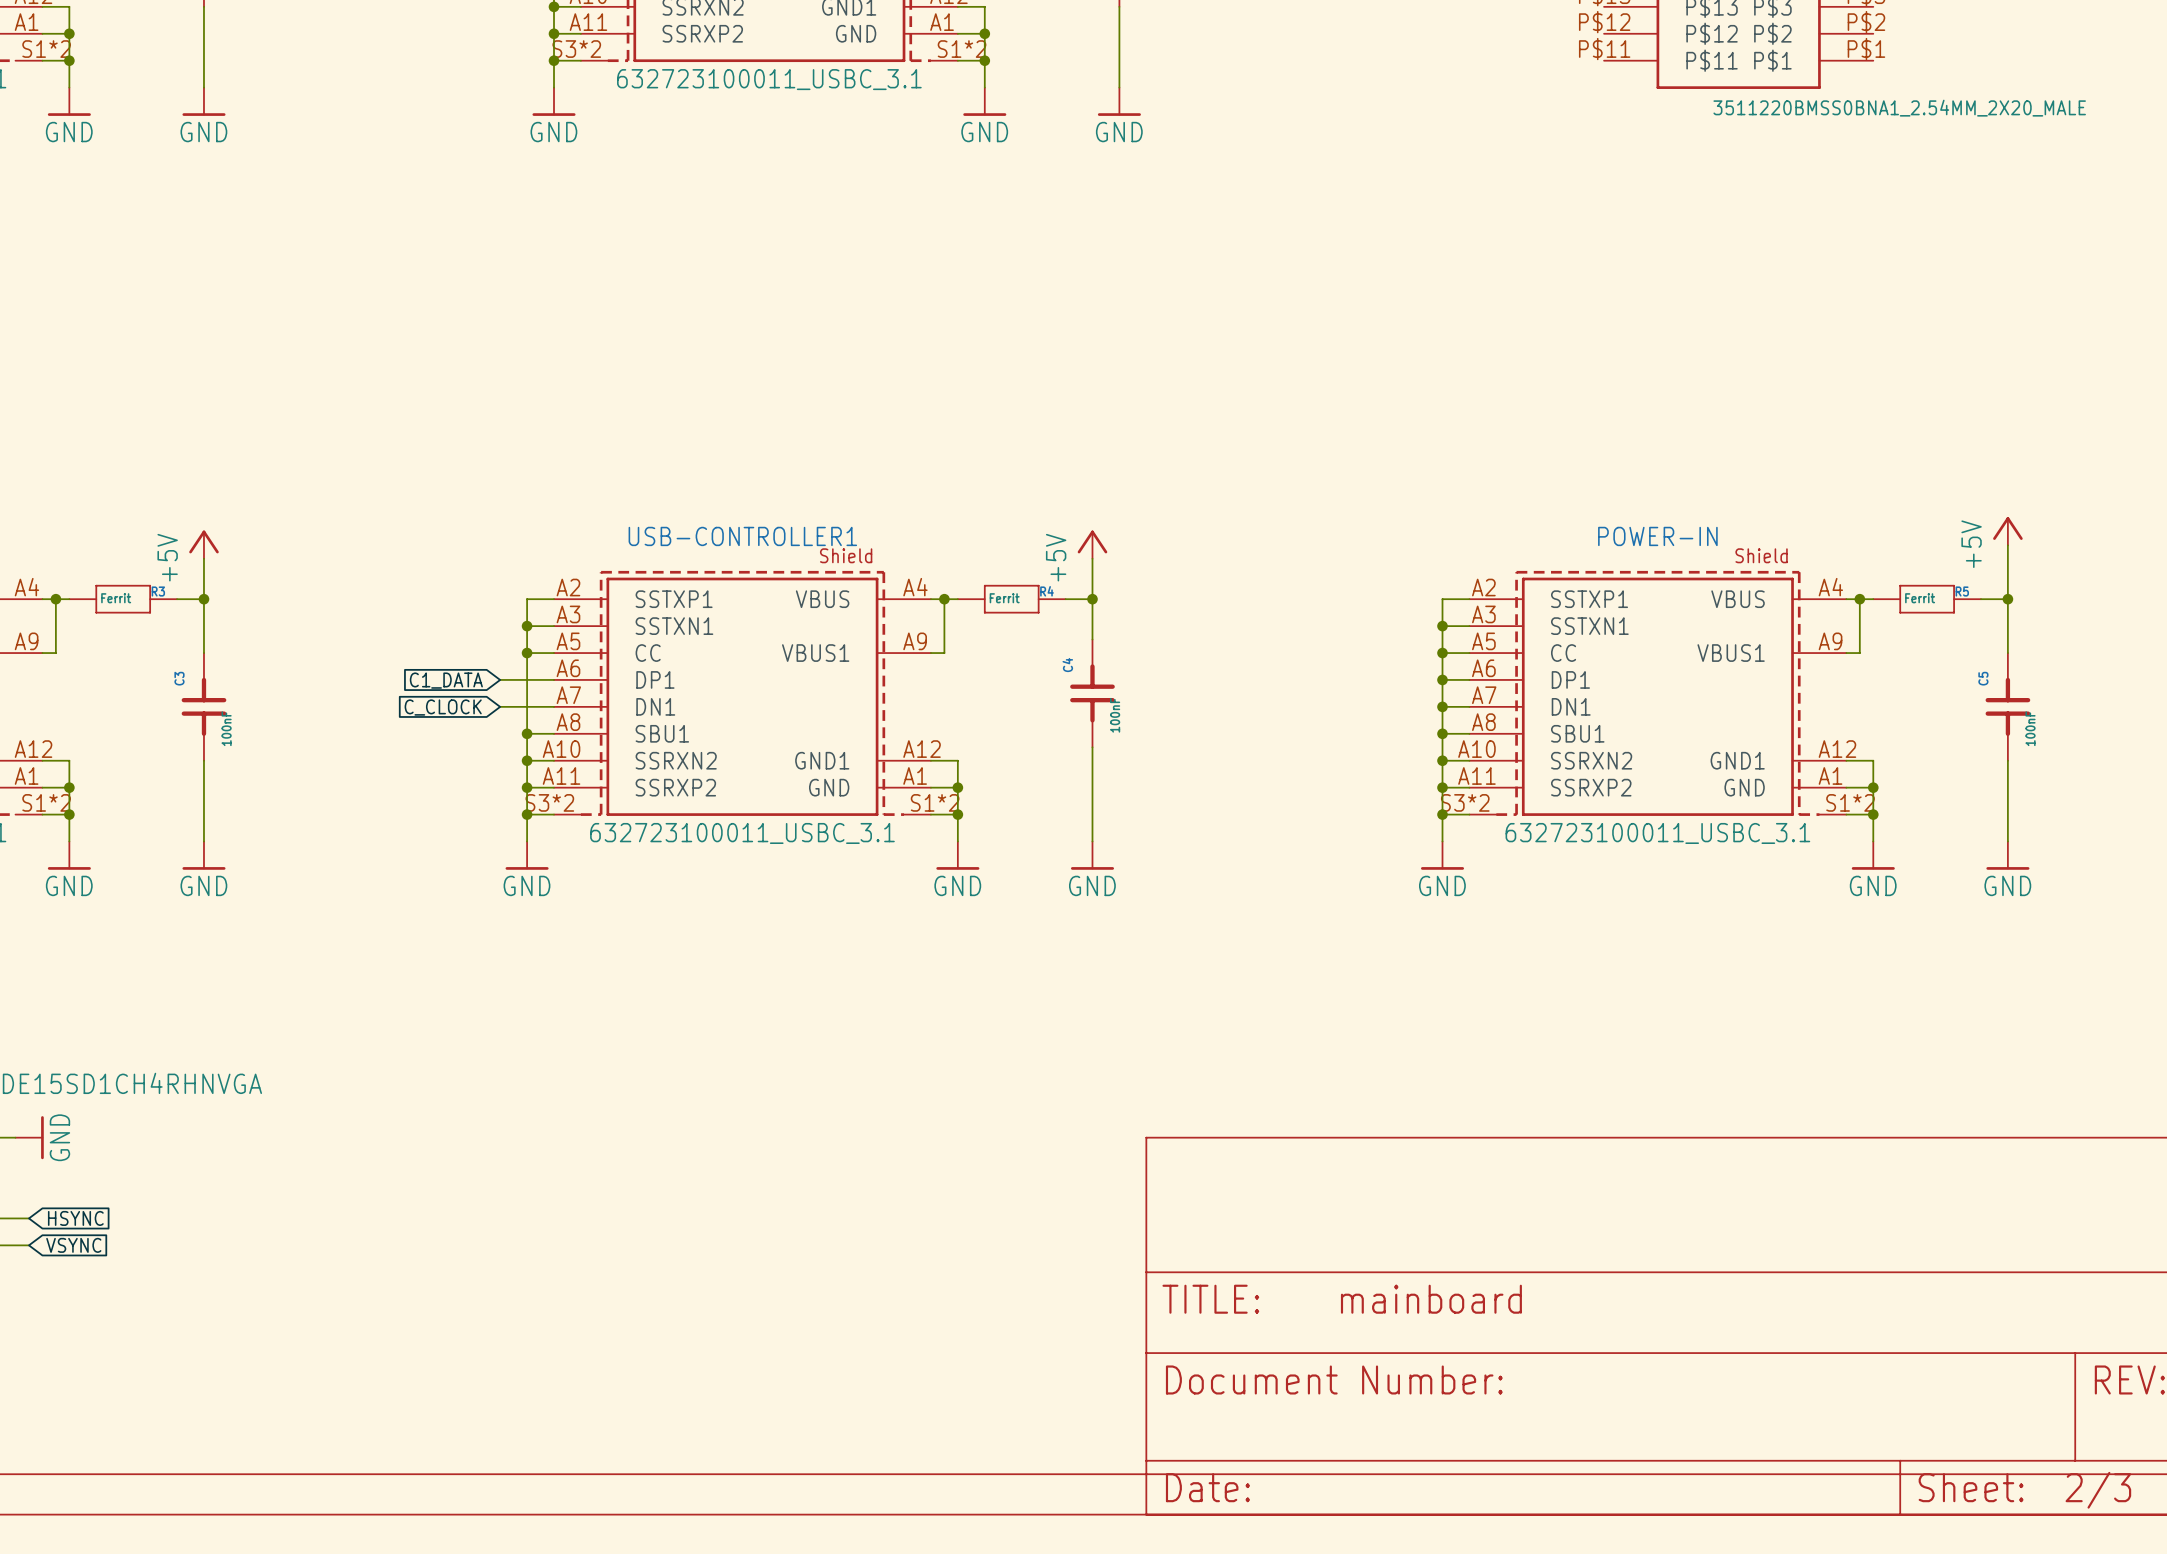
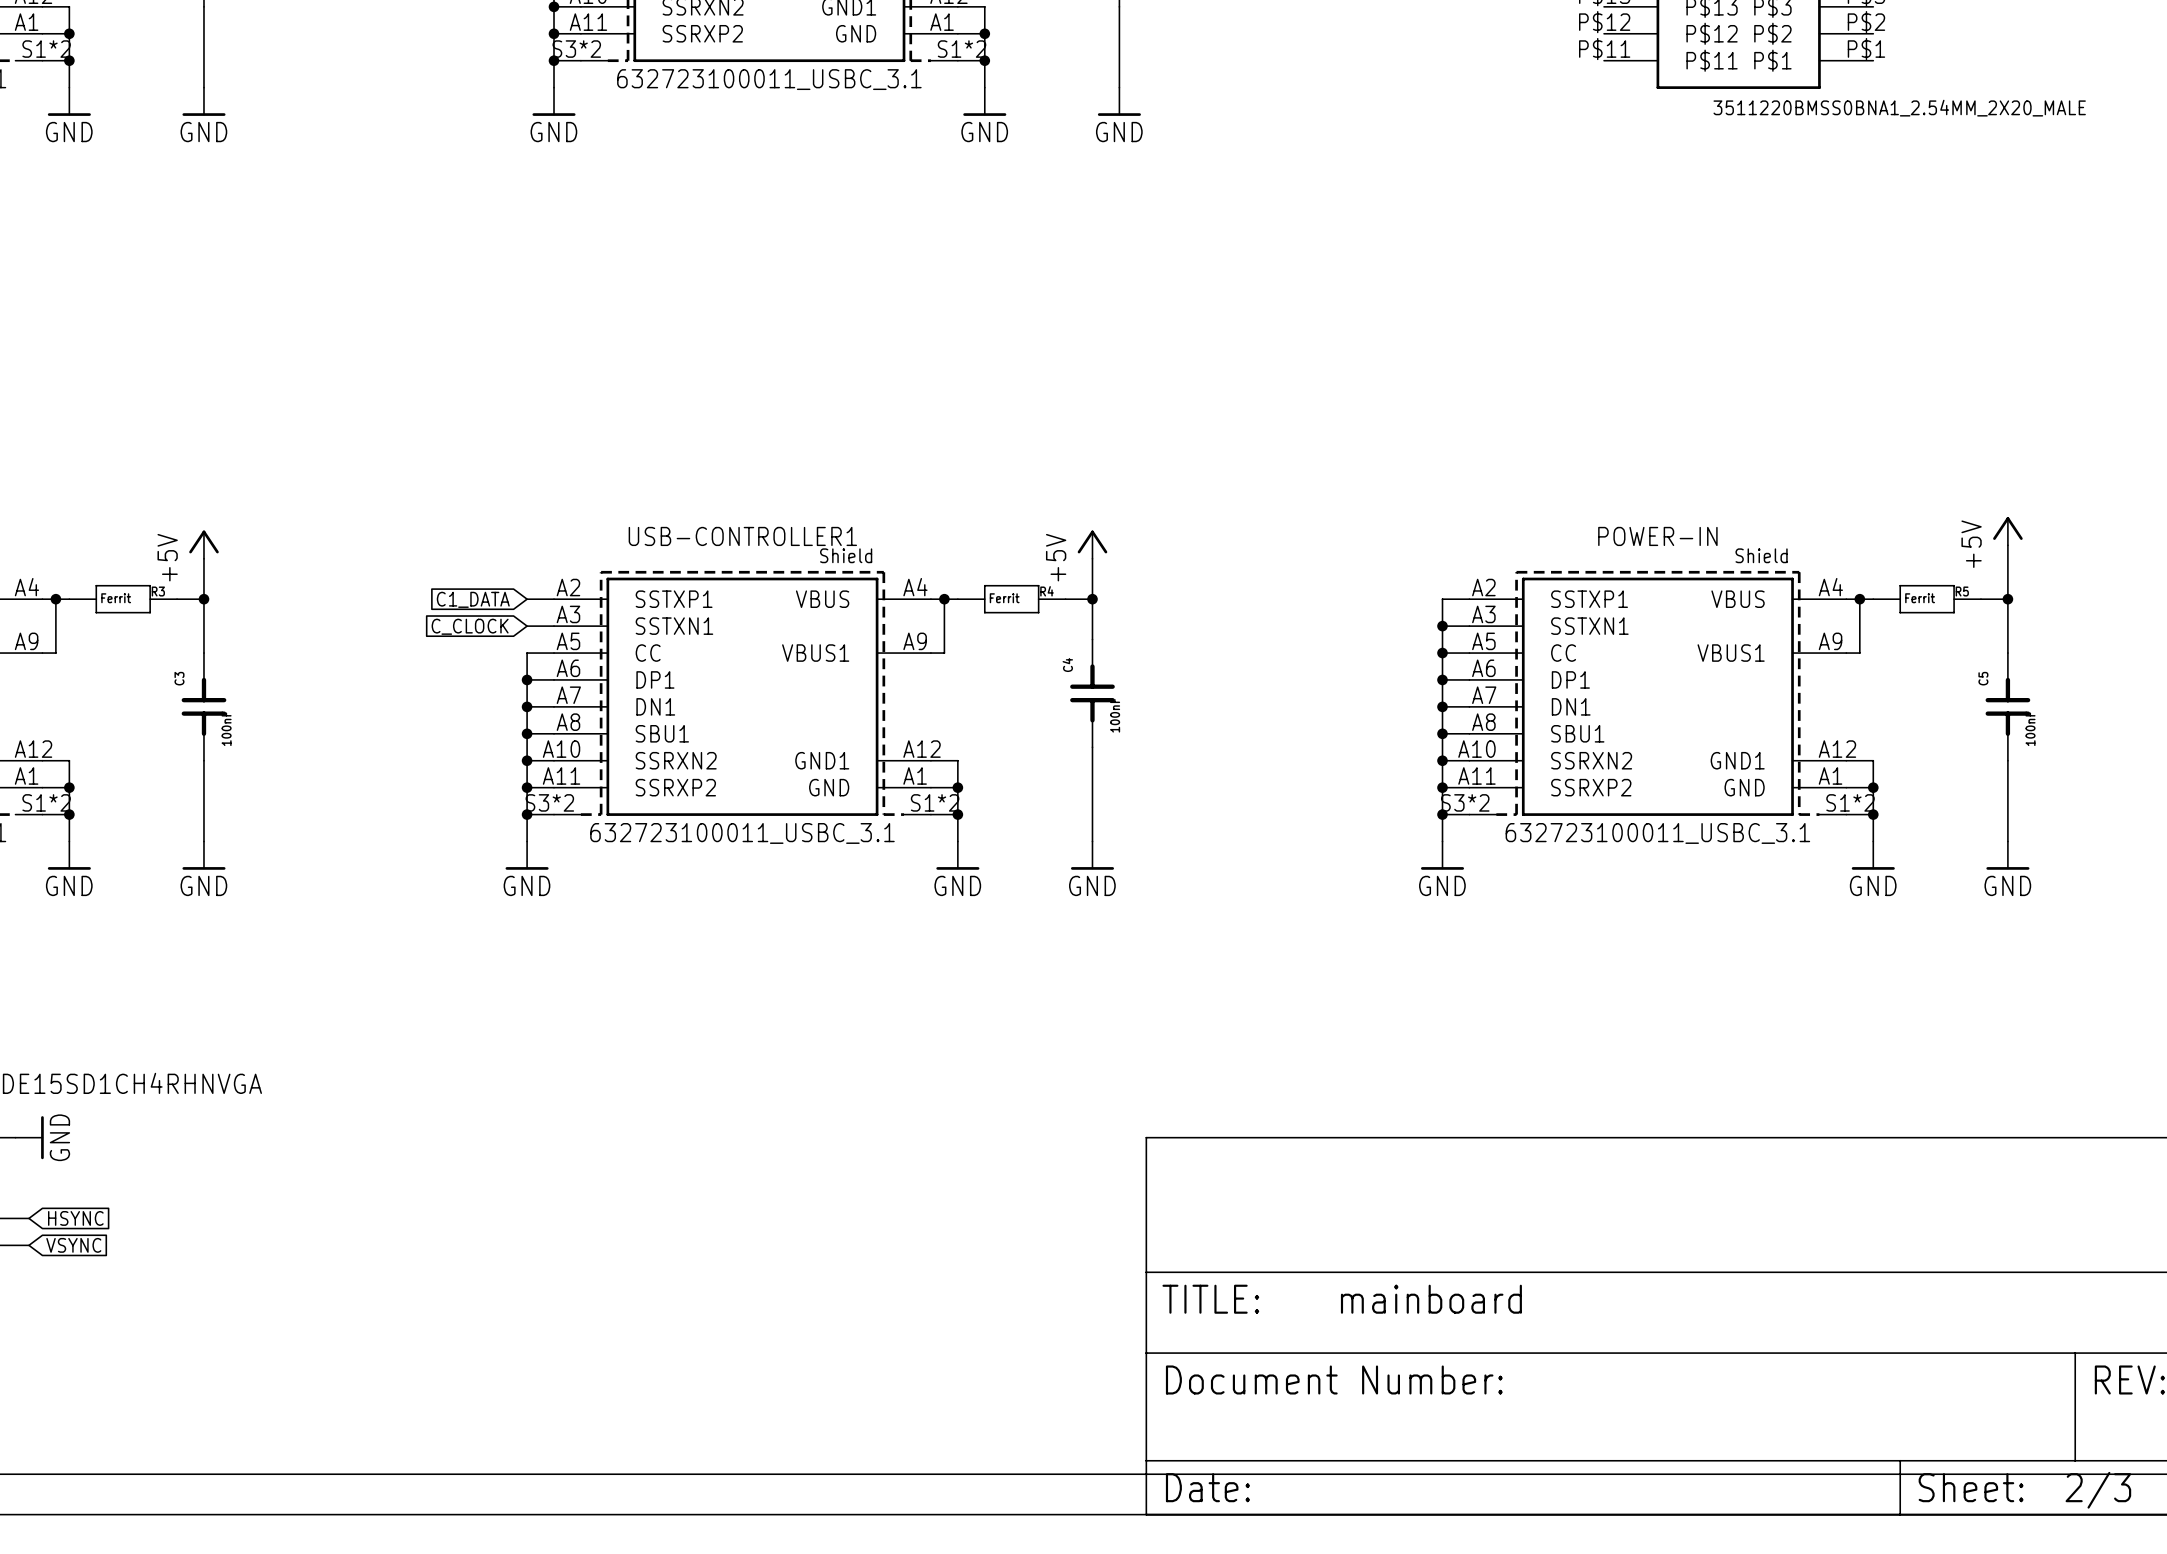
wire: (527, 599) (527, 653) -> none
junction: (527, 626) -> none
junction: (527, 653) -> none
wire: (500, 679) (527, 679) -> none
junction: none -> (527, 679)
global label position: C1_DATA (446, 680) -> C1_DATA (473, 599)
wire: (500, 706) (527, 706) -> none
junction: none -> (527, 706)
global label position: C_CLOCK (443, 707) -> C_CLOCK (470, 626)

